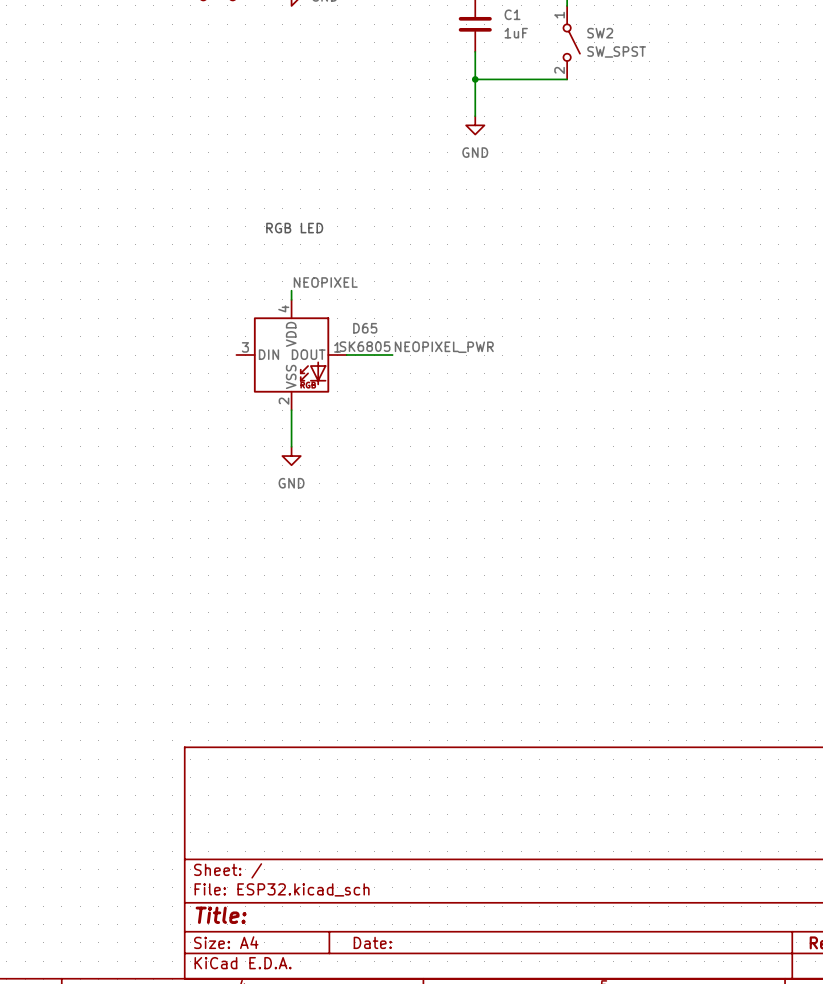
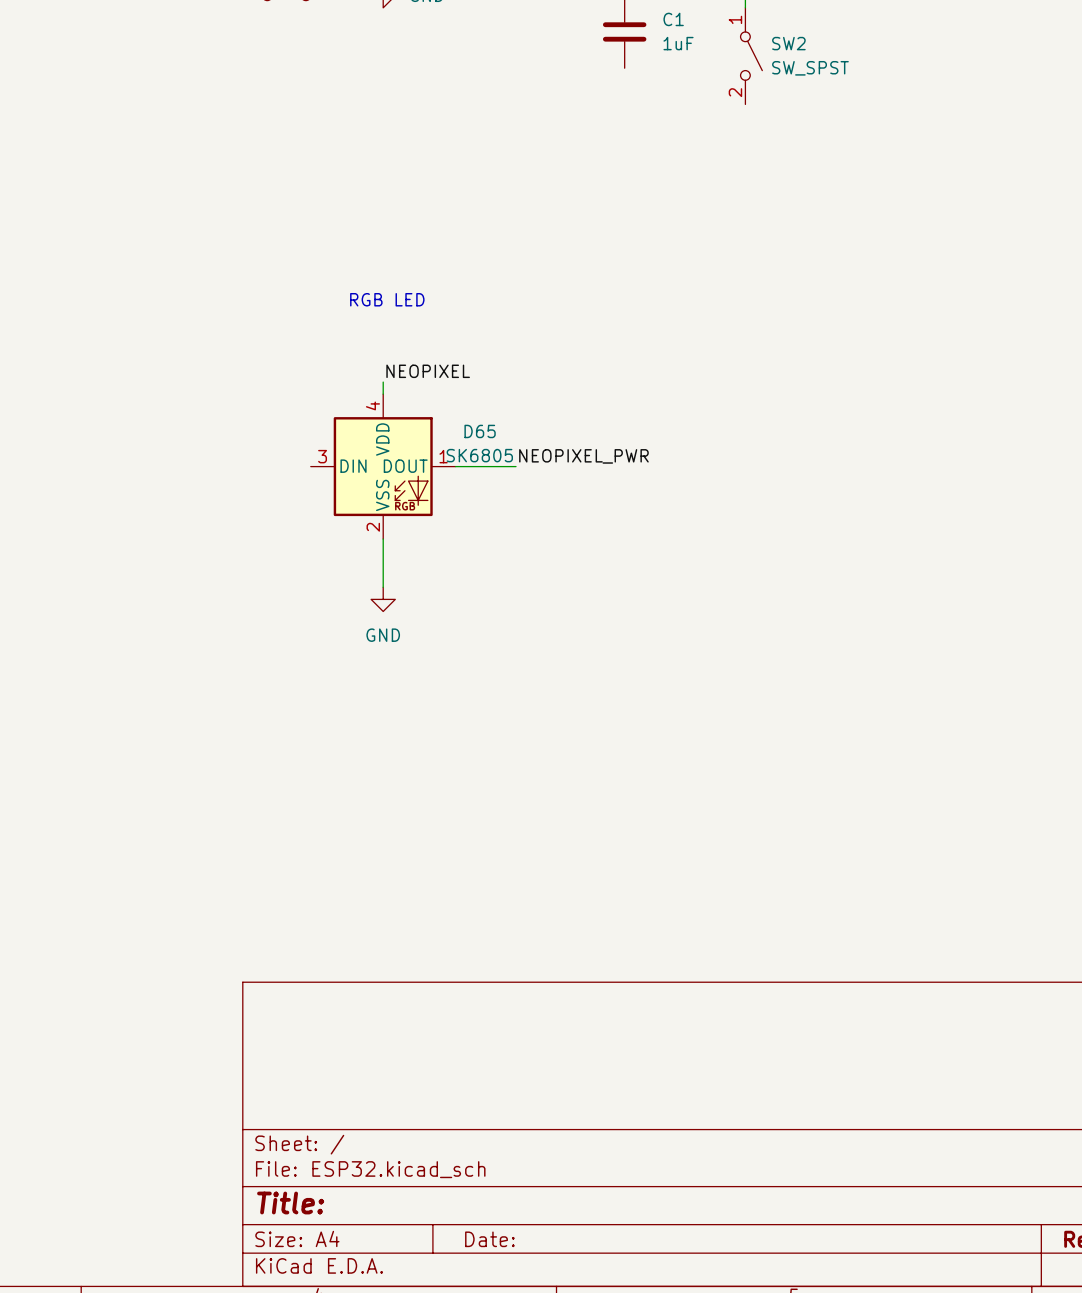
wire: (475, 51) (475, 116) -> none
wire: (475, 79) (567, 79) -> none
junction: (475, 79) -> none
power symbol: GND (475, 125) -> none

